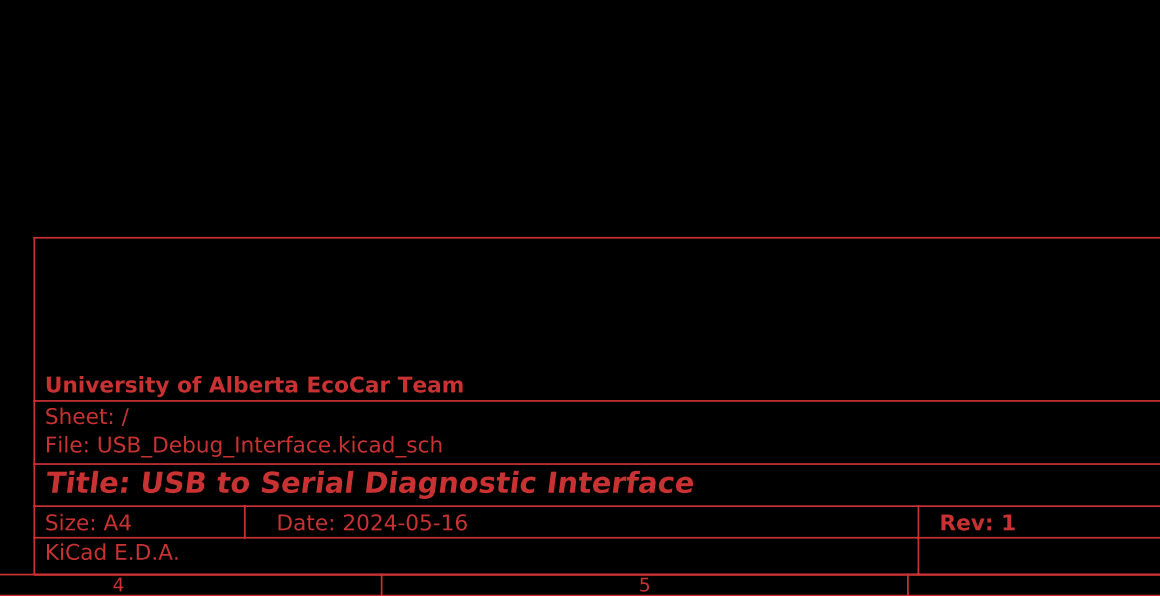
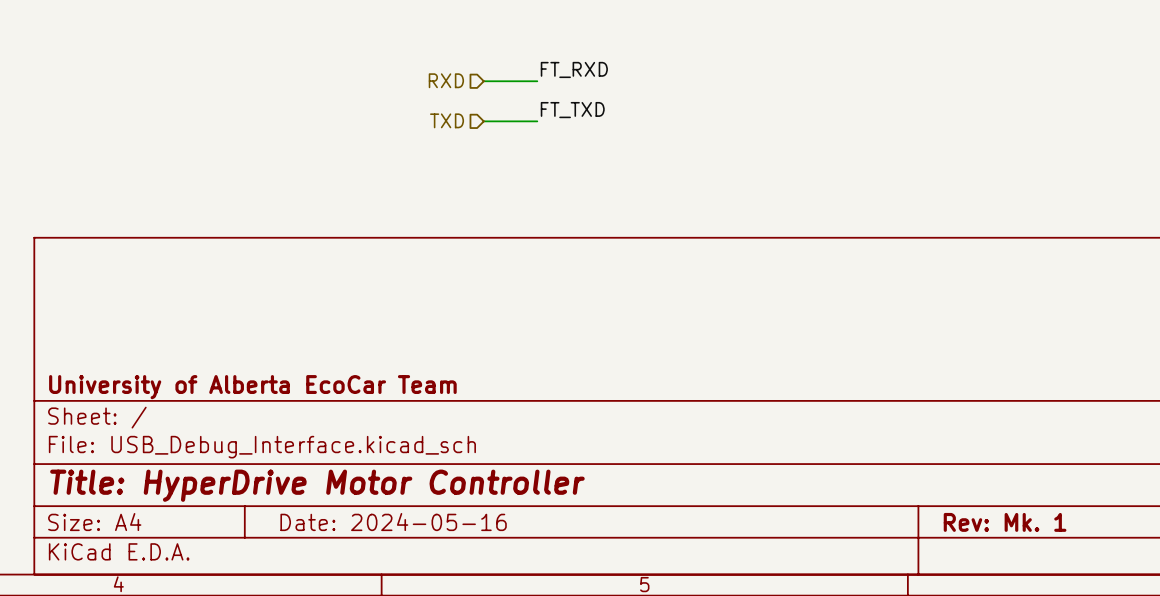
label: none -> FT_RXD (574, 69)
hierarchical label: none -> RXD (446, 80)
wire: none -> (483, 81) (537, 81)
label: none -> FT_TXD (572, 110)
hierarchical label: none -> TXD (447, 120)
wire: none -> (483, 121) (537, 121)
title block: Title: USB to Serial Diagnostic Interface (370, 484) -> Title: HyperDrive Motor Controller (317, 485)
title block: Rev: 1 (978, 522) -> Rev: Mk. 1 (1005, 522)

